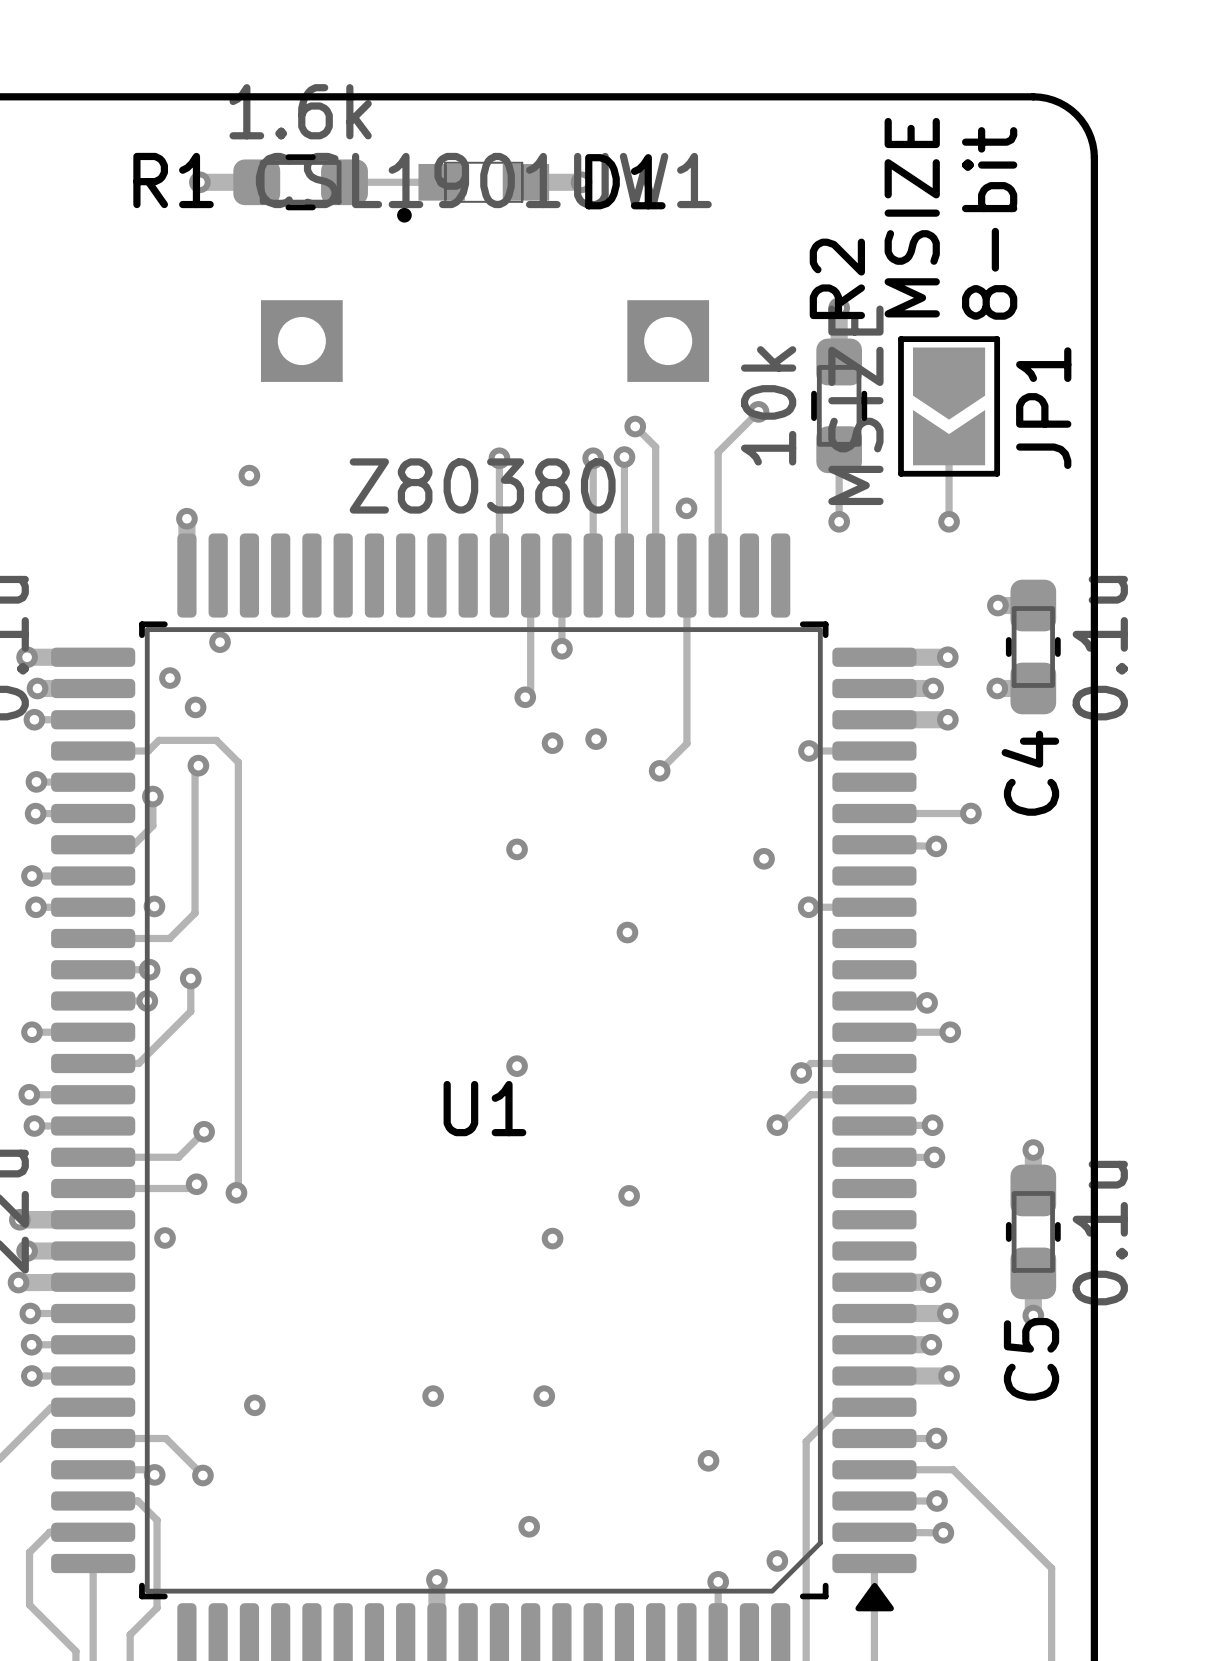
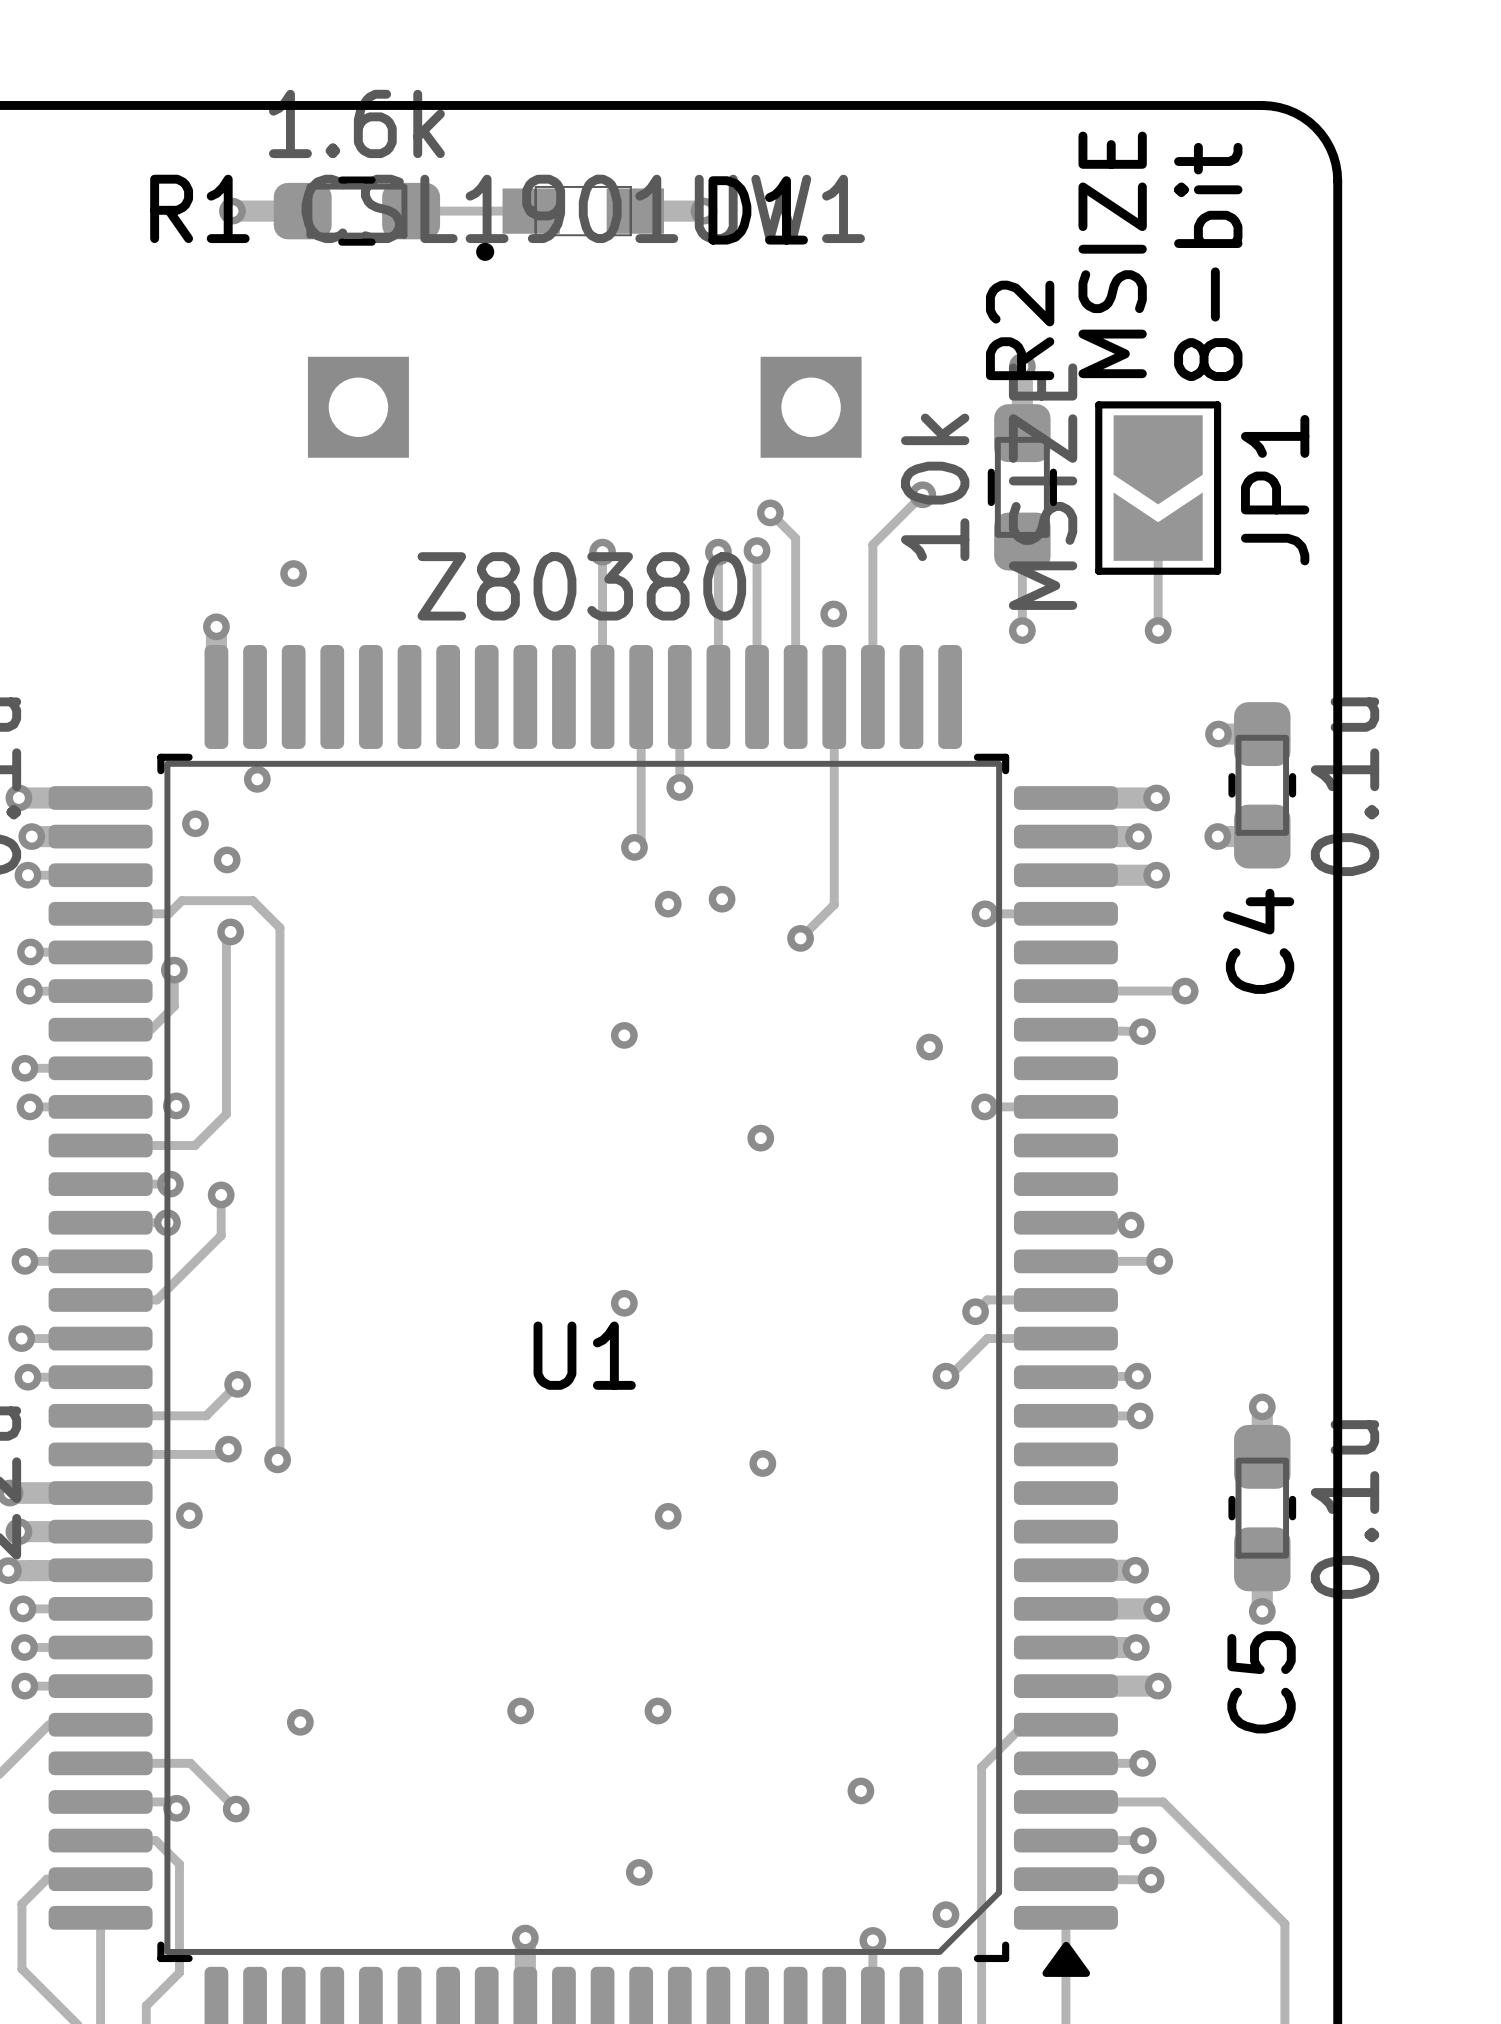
C5 name position: C5 (1031, 1359) -> C5 (1261, 1682)

